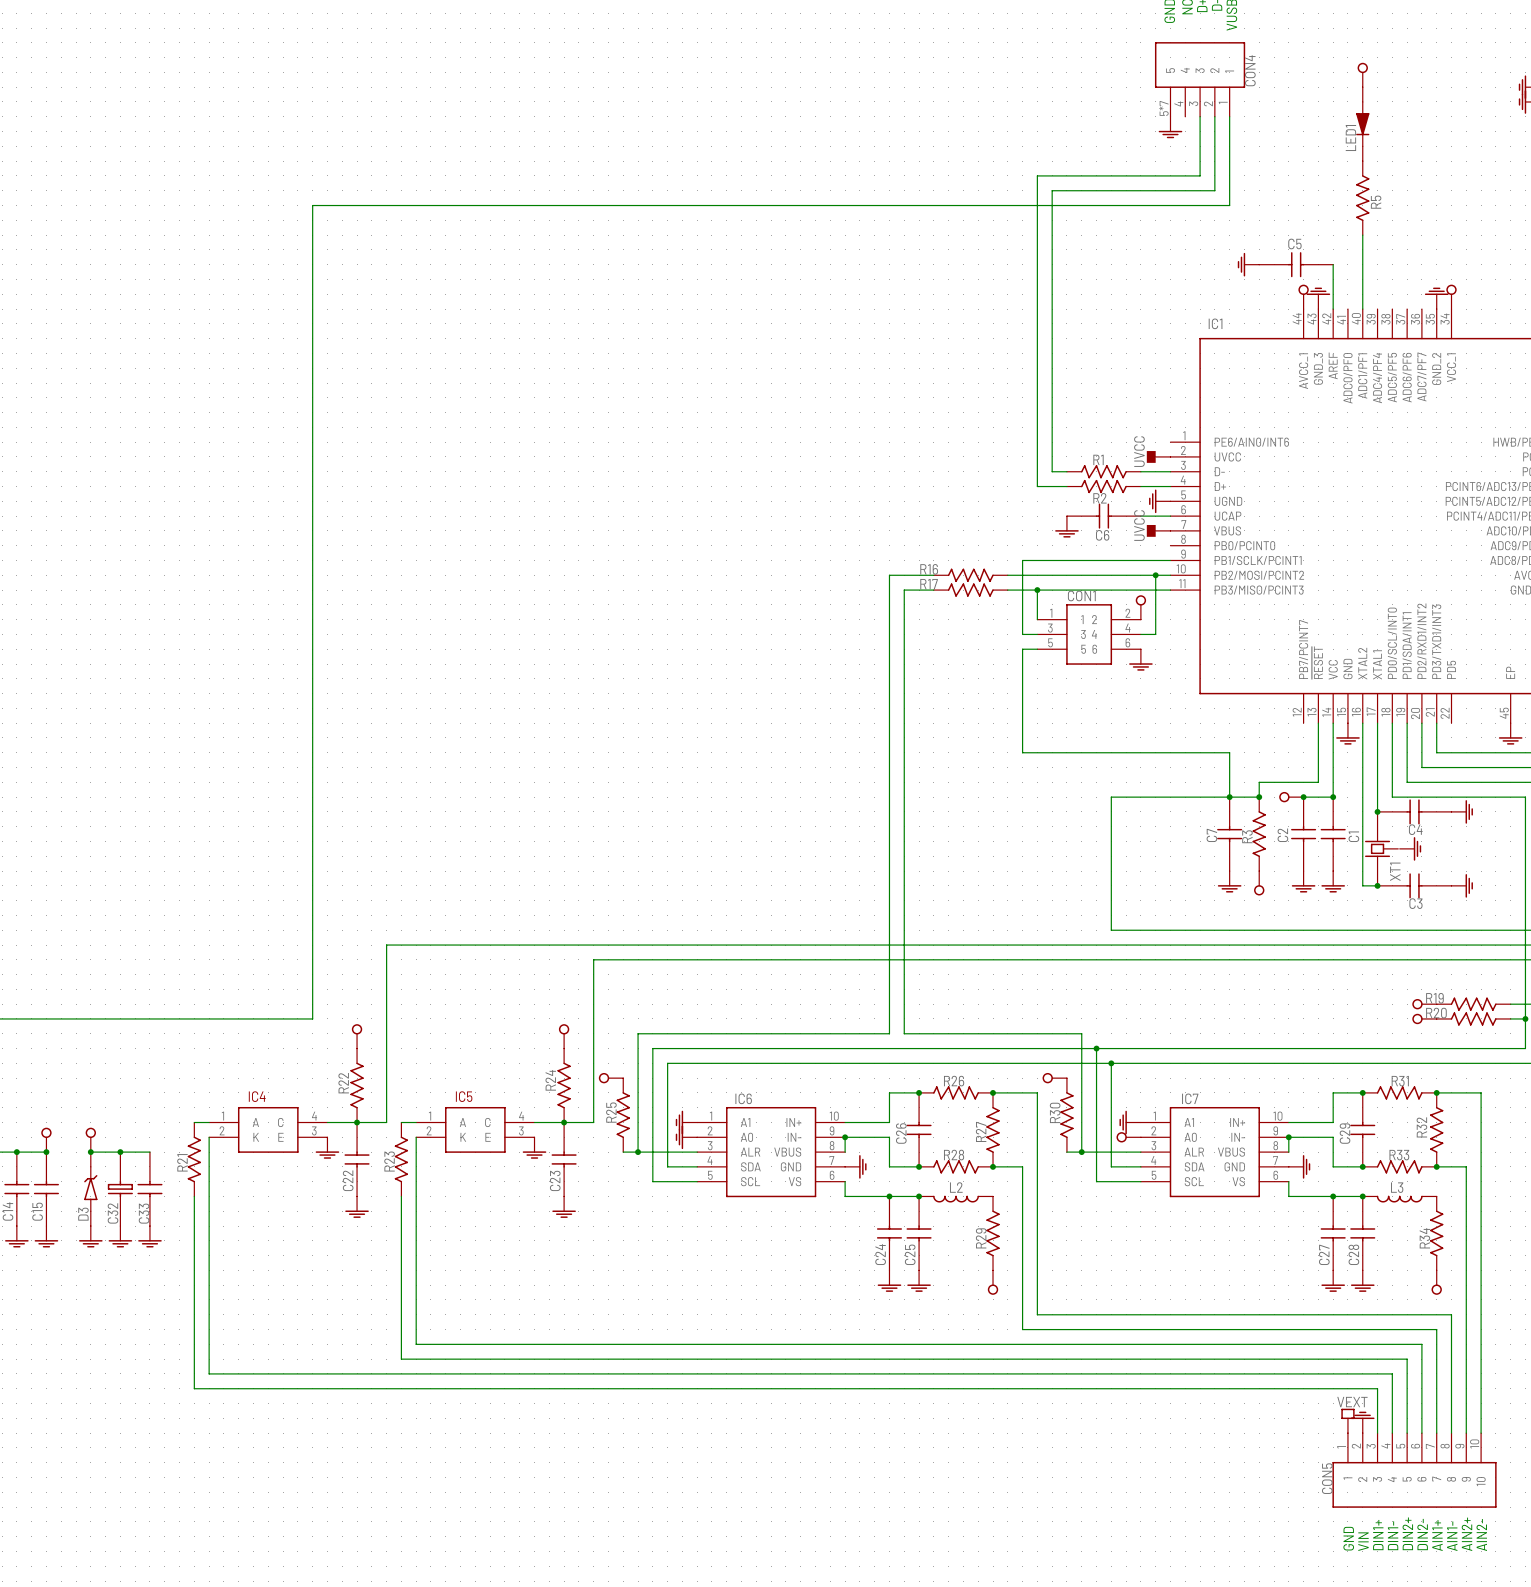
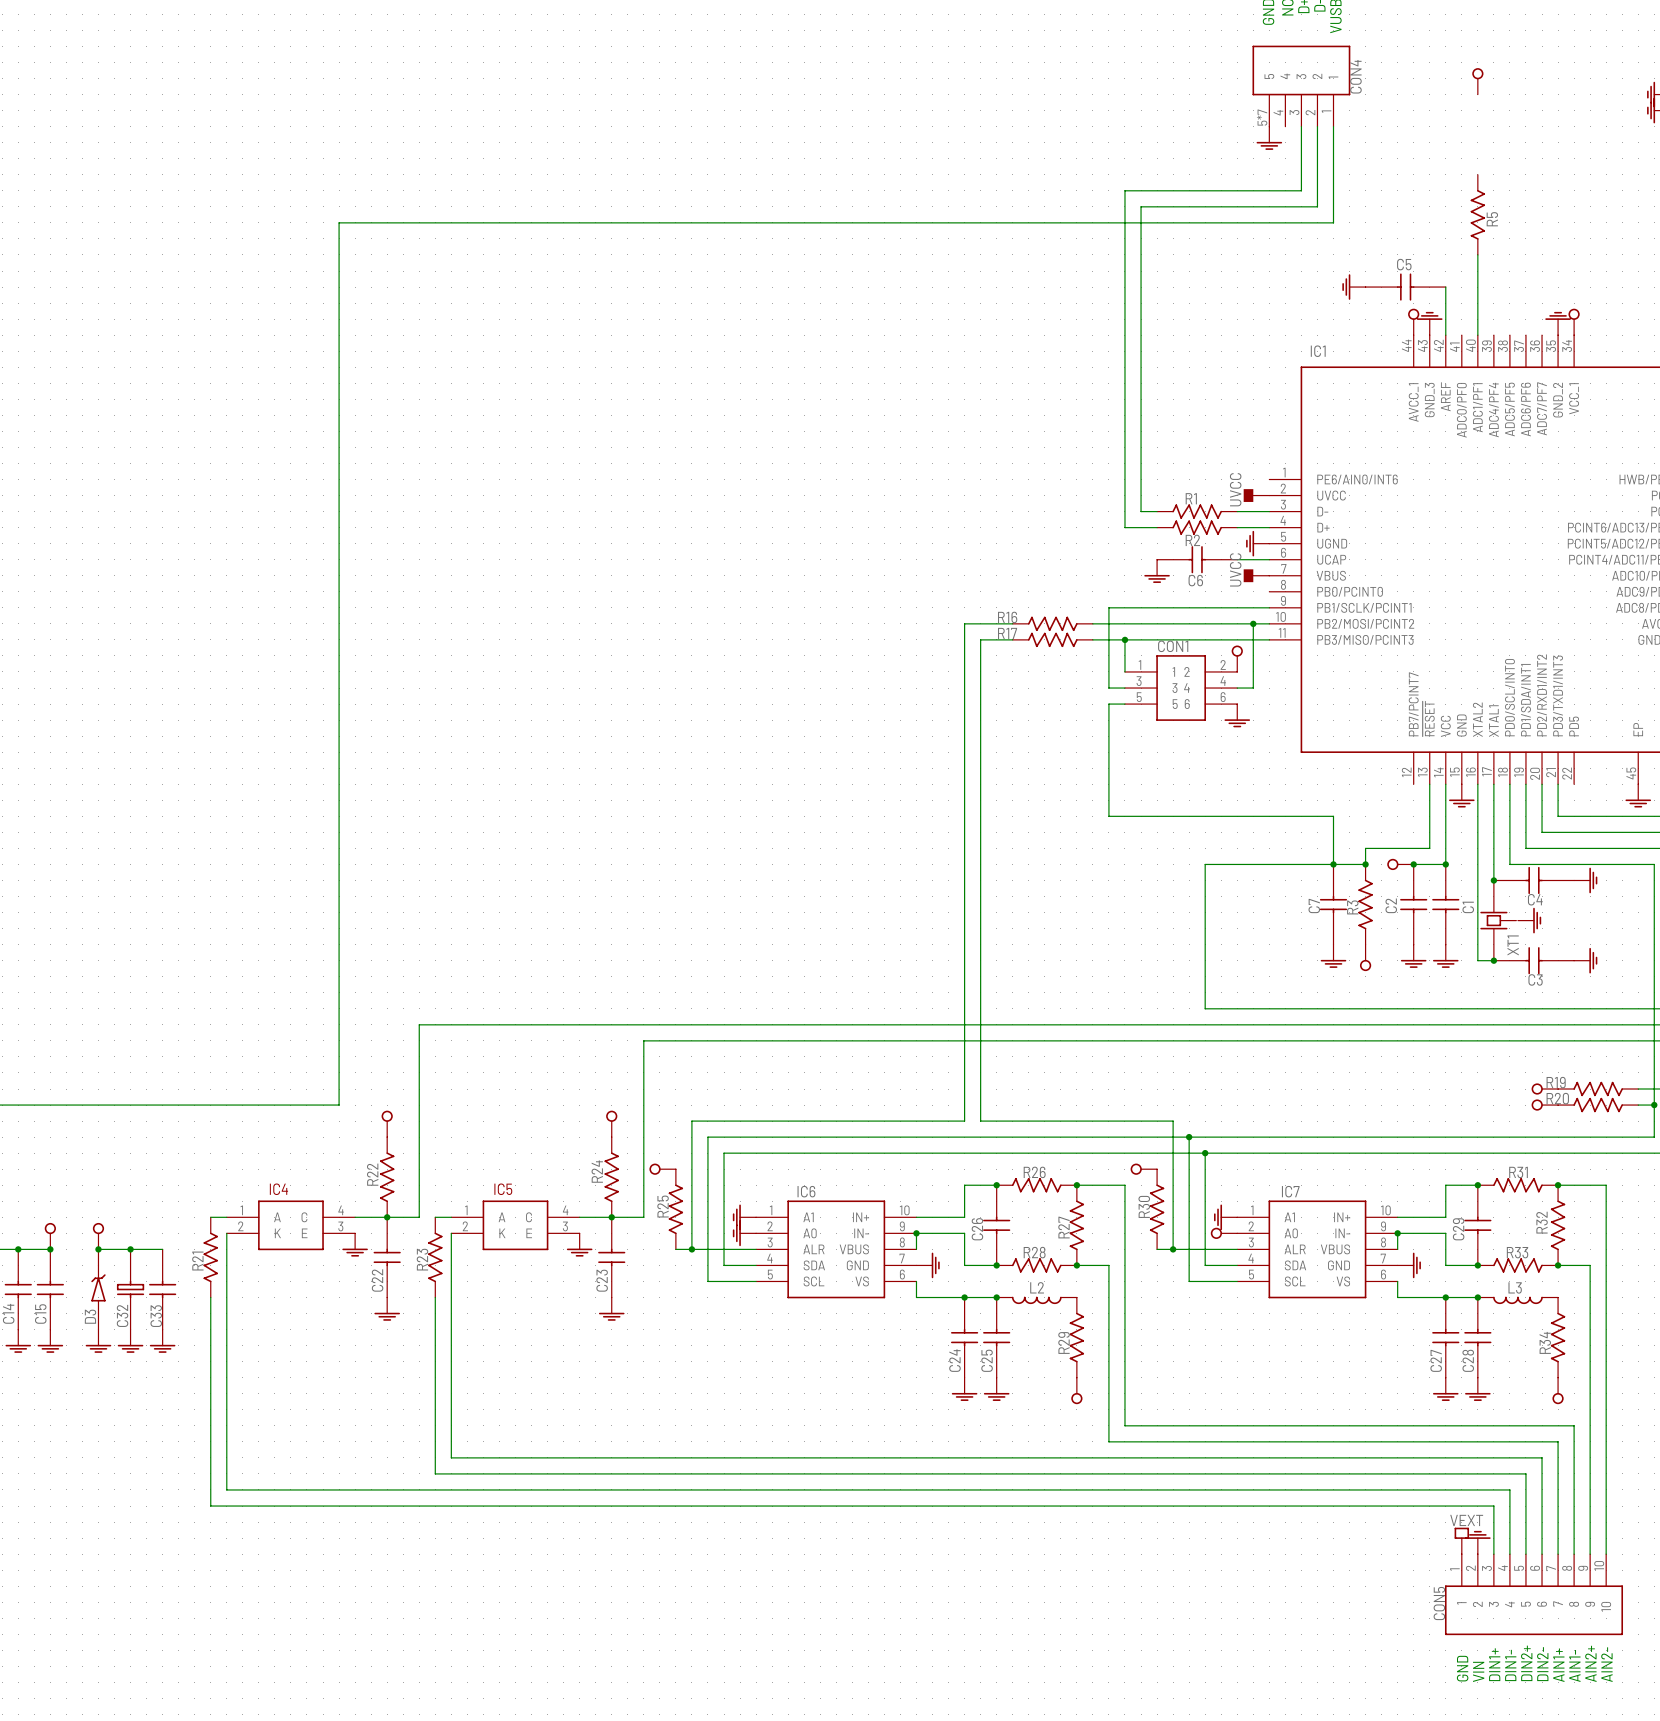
LED1: (1362, 124) -> none

